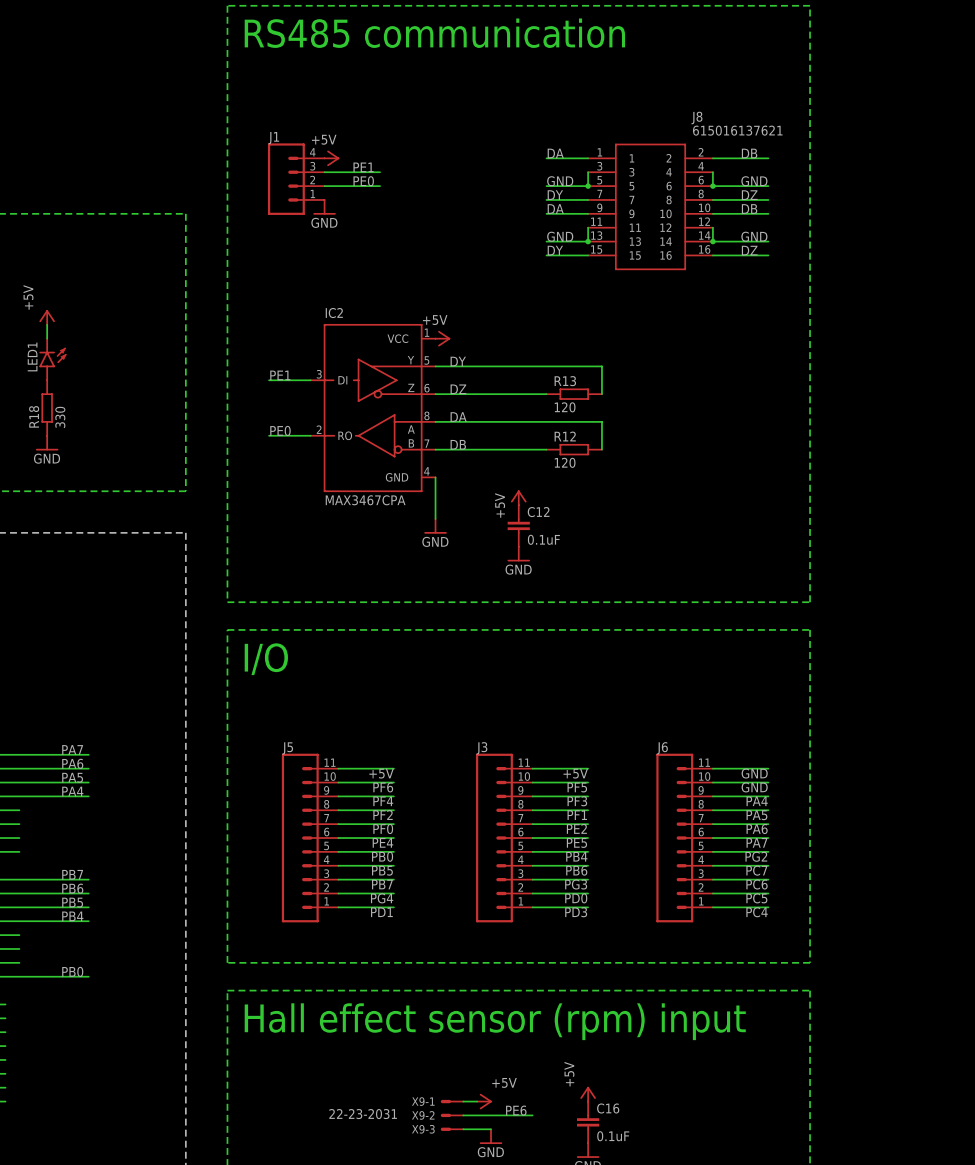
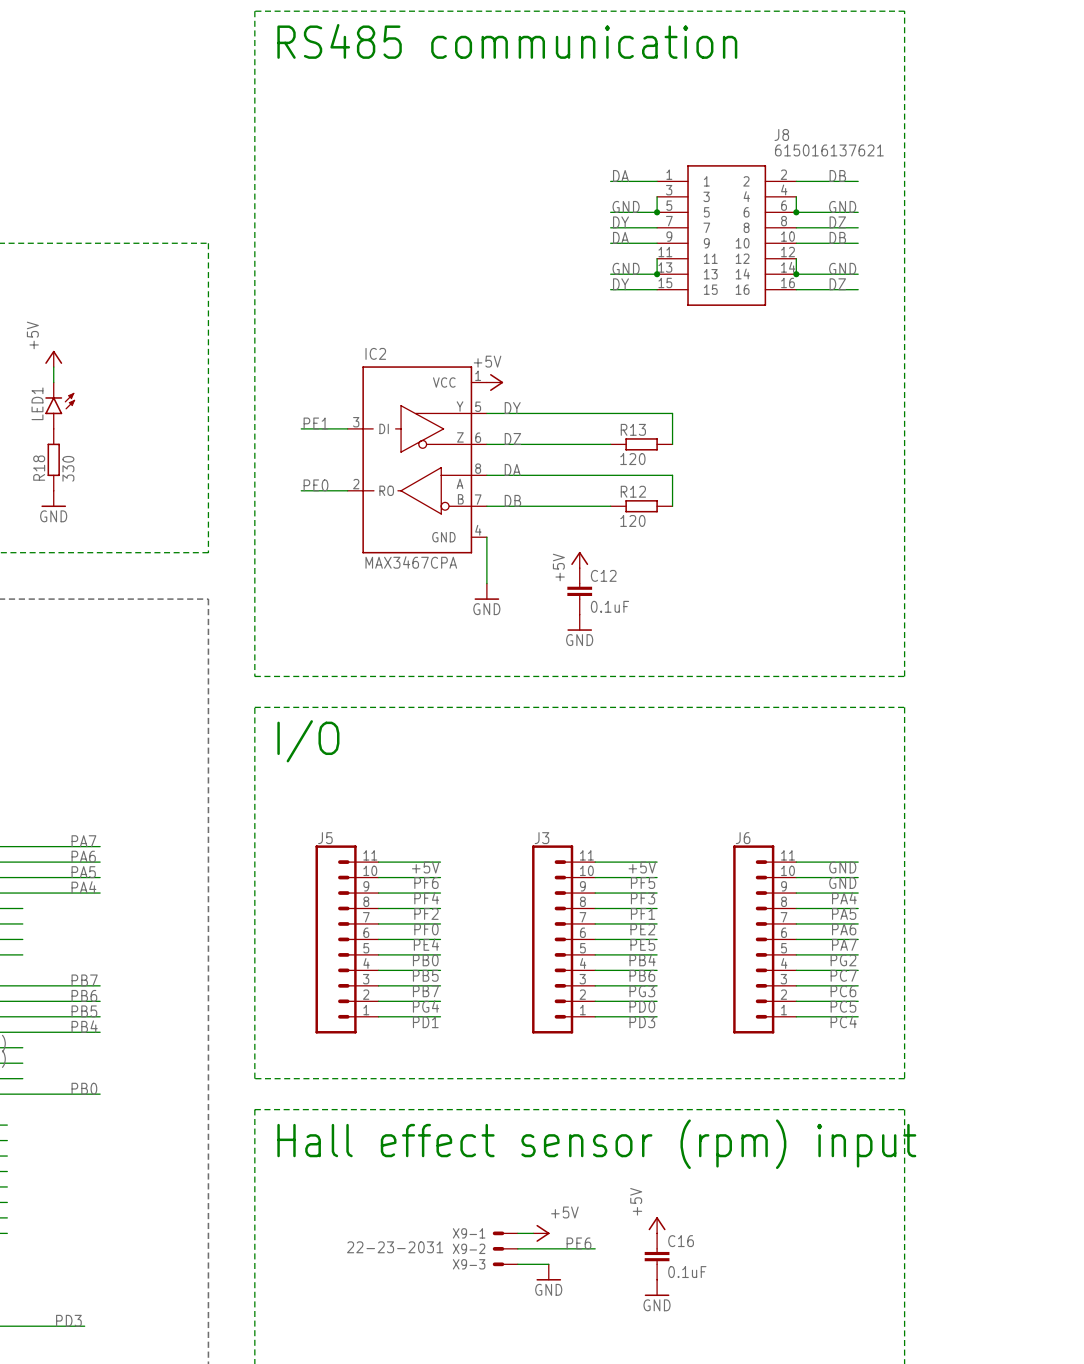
power symbol: +5V (331, 158) -> none
label: PE1 (363, 167) -> none
wire: (324, 172) (380, 172) -> none
J1: (296, 179) -> none
label: PE0 (363, 181) -> none
wire: (324, 186) (380, 186) -> none
power symbol: GND (324, 207) -> none

